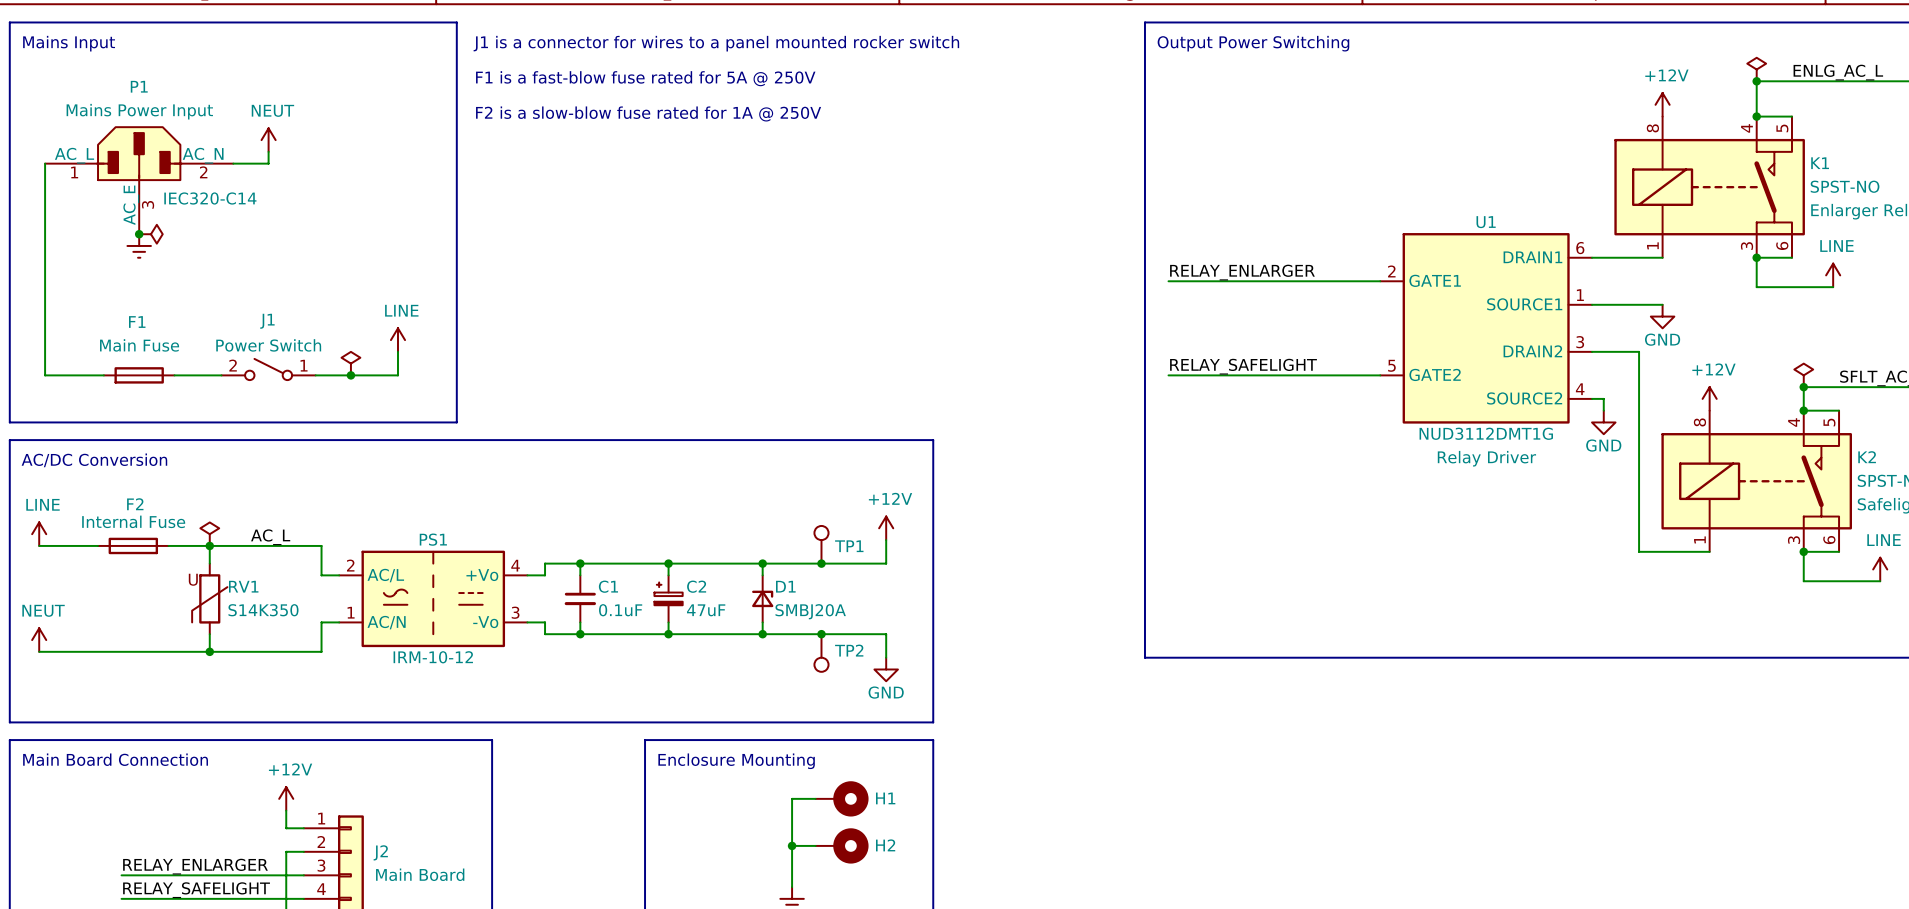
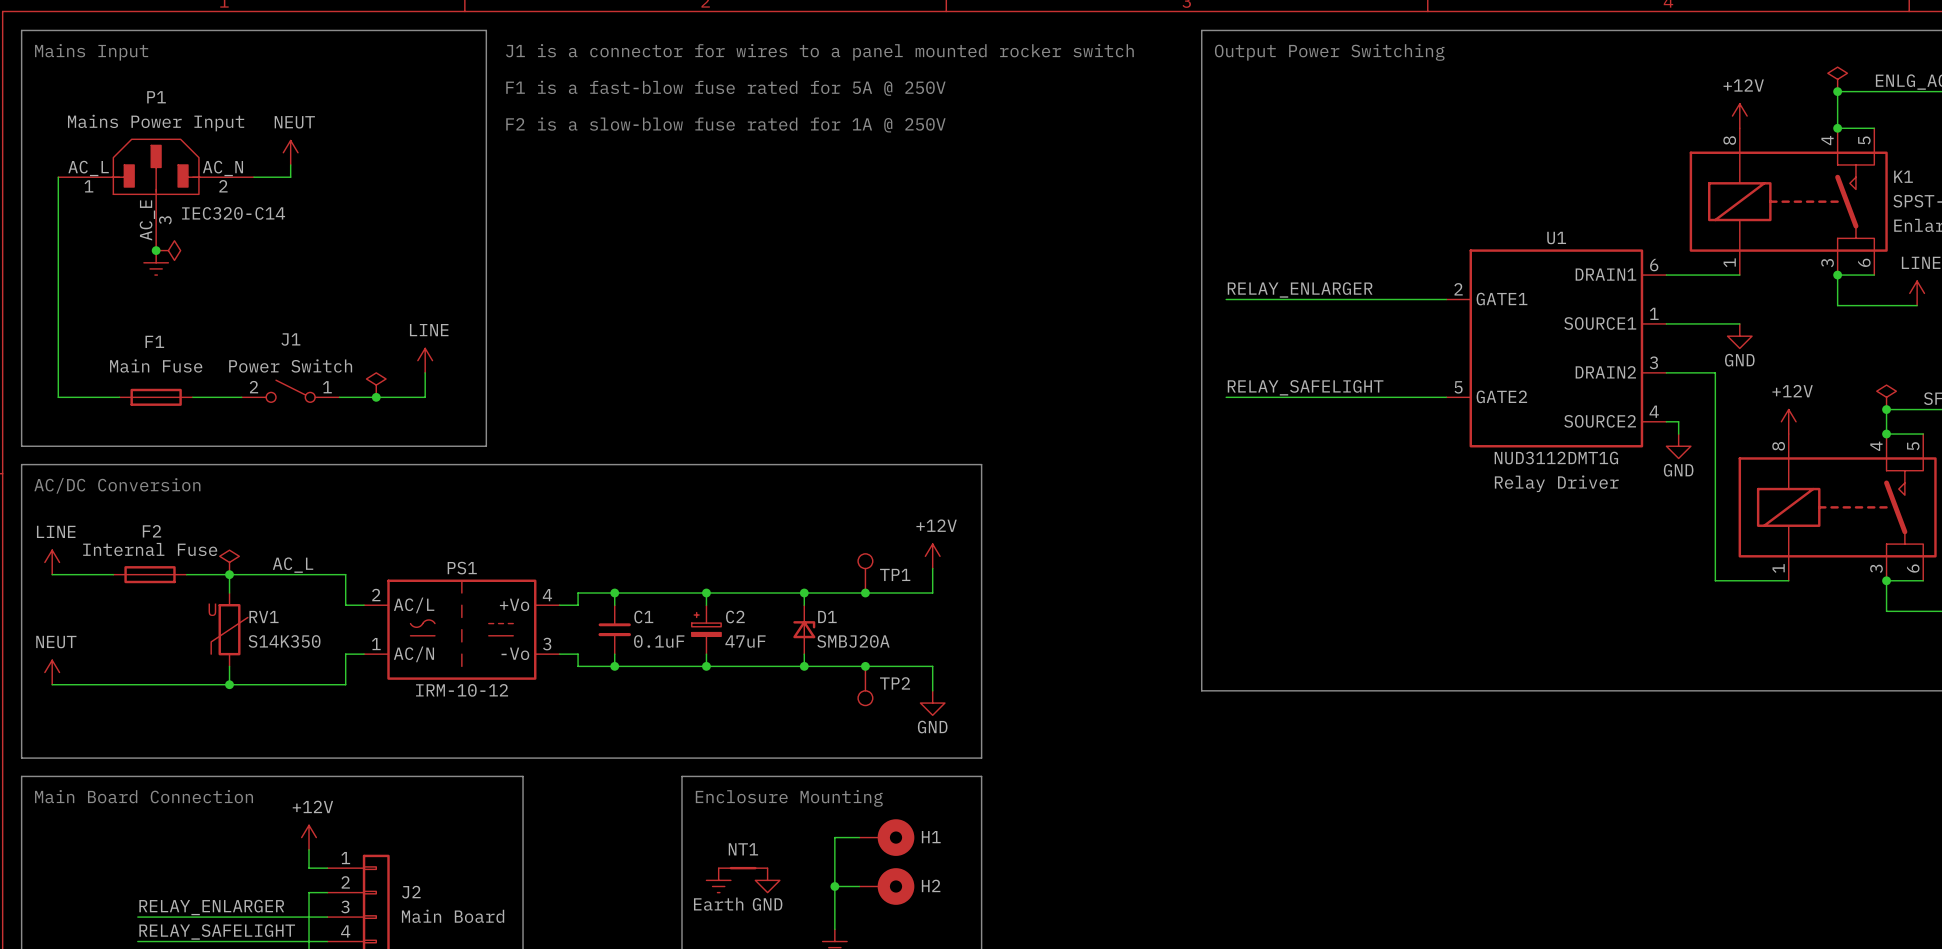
NT1: none -> (743, 868)
power symbol: none -> Earth (718, 880)
power symbol: none -> GND (767, 880)

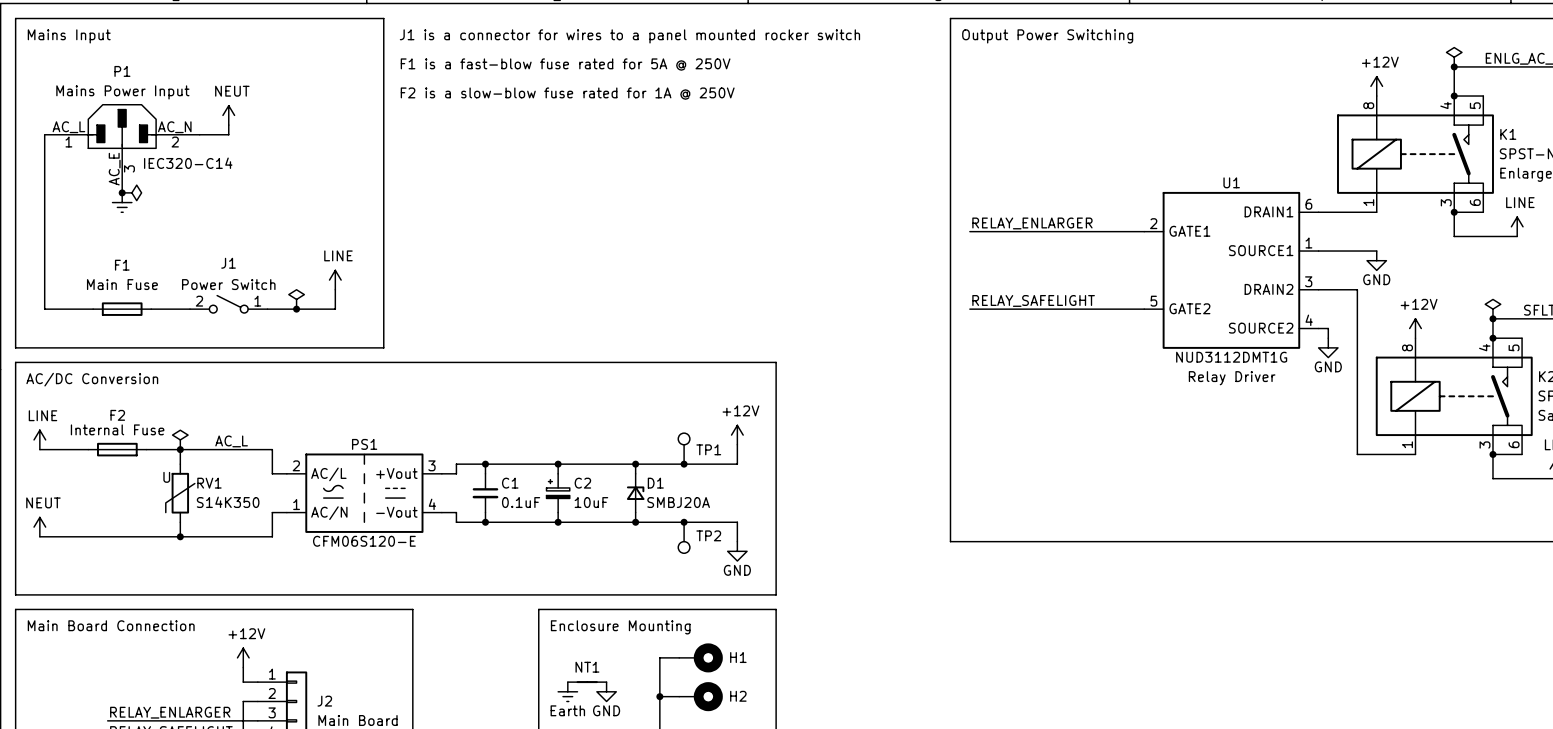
PS1 pin number: 4 (547, 595) -> 3 (431, 465)
PS1 pin name: +Vo (514, 604) -> +Vout (396, 473)
C2 value: 47uF (745, 641) -> 10uF (591, 502)
PS1 pin number: 3 (547, 644) -> 4 (432, 504)
PS1 pin name: -Vo (515, 653) -> -Vout (396, 512)
PS1 value: IRM-10-12 (462, 690) -> CFM06S120-E (364, 541)

